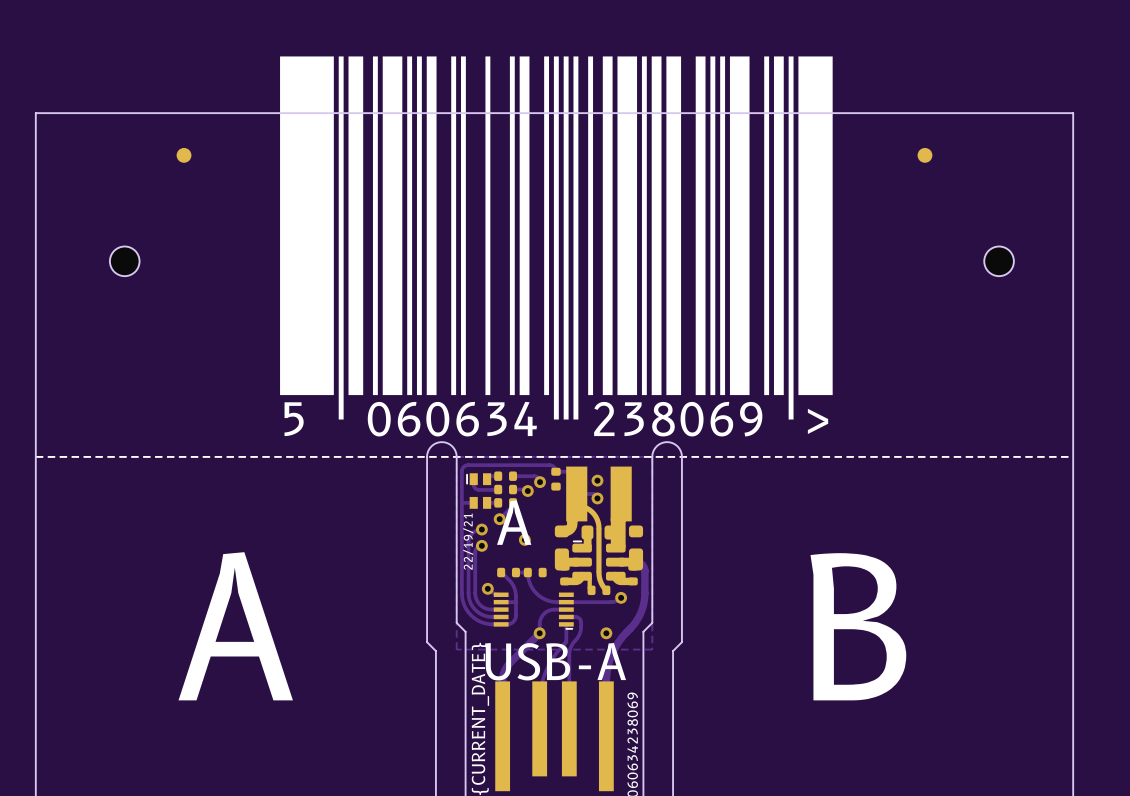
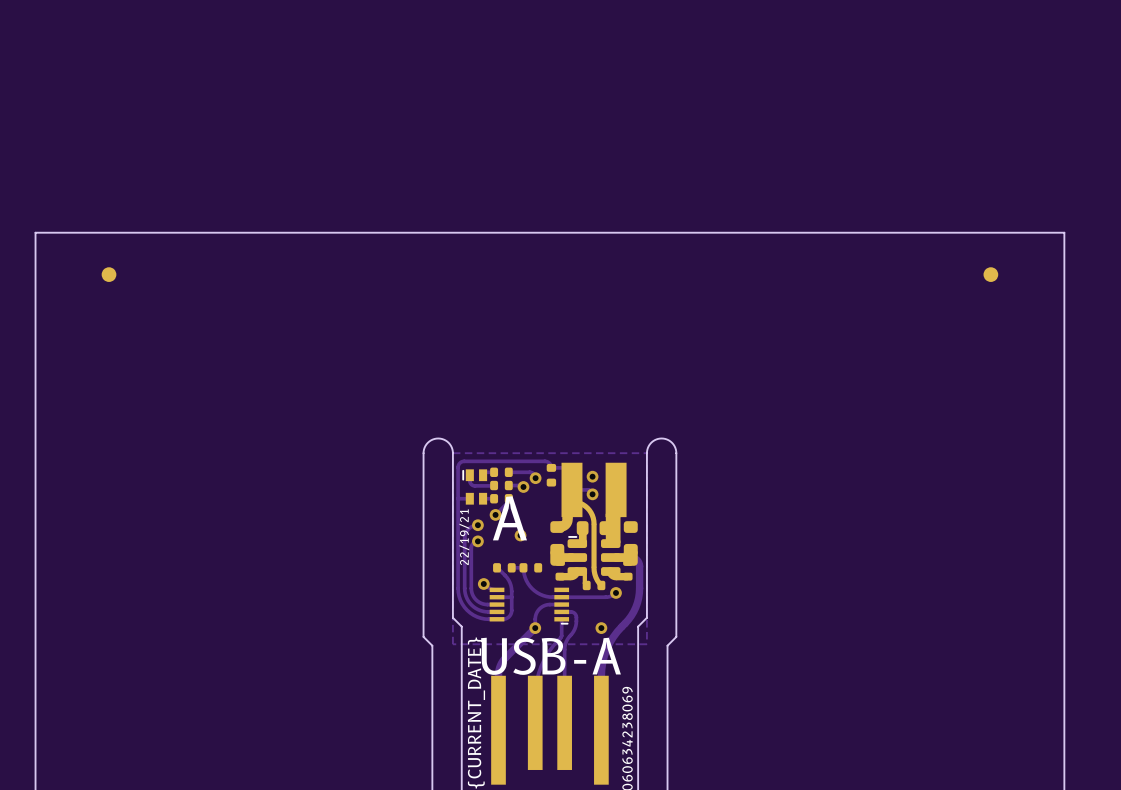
drawing: [280, 56, 833, 420] -> none
part position: (184, 155) -> (109, 274)
part position: (924, 155) -> (990, 274)
board edge: (35, 234) (35, 113) (1073, 113) (1073, 234) -> (35, 232) (1064, 232)
part: (124, 261) -> none
part: (999, 261) -> none
line: (35, 456) (1073, 456) -> none
text: A (235, 626) -> none
text: B (858, 626) -> none

